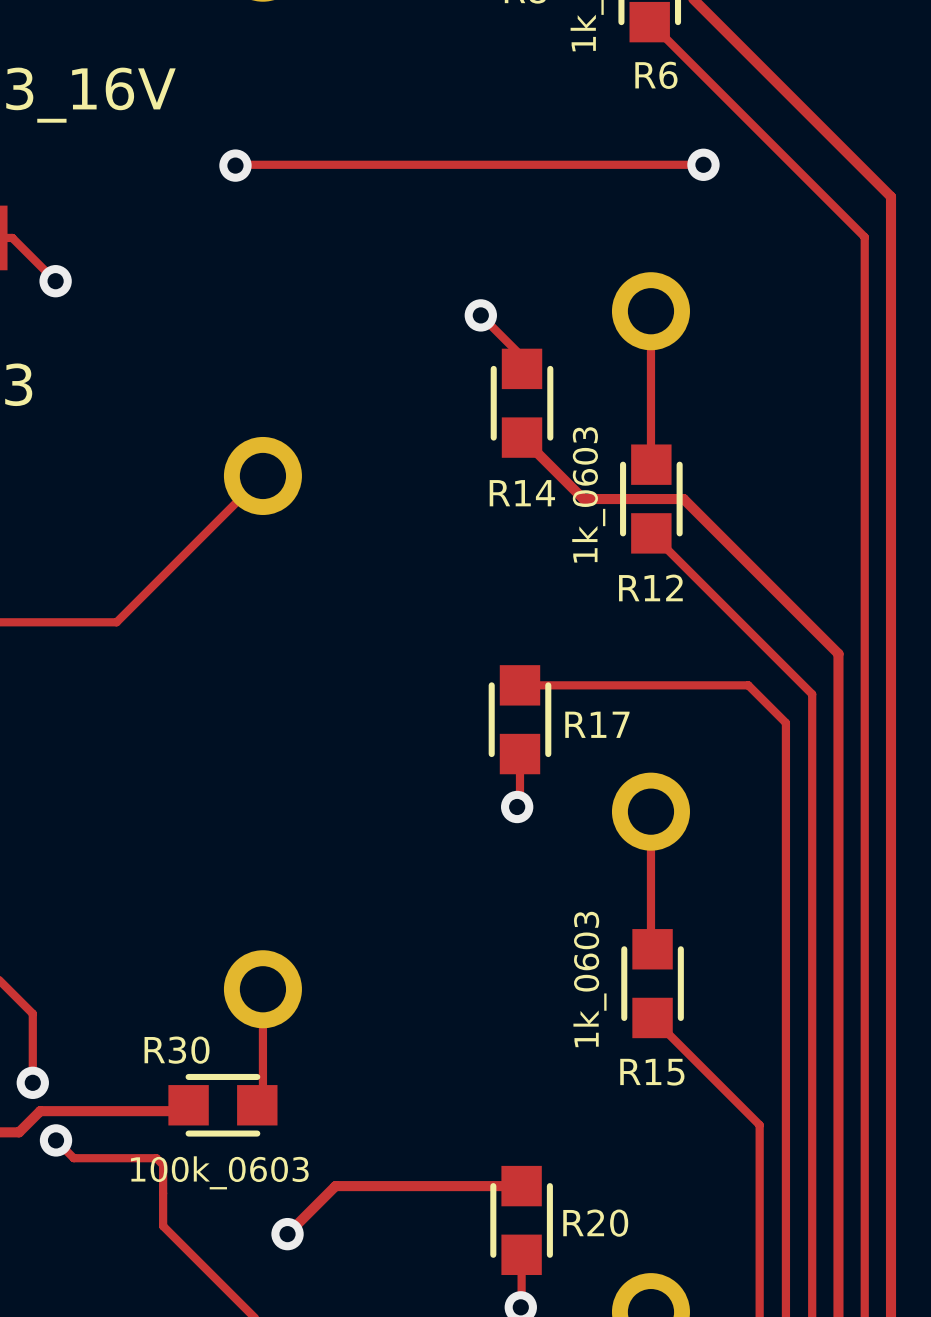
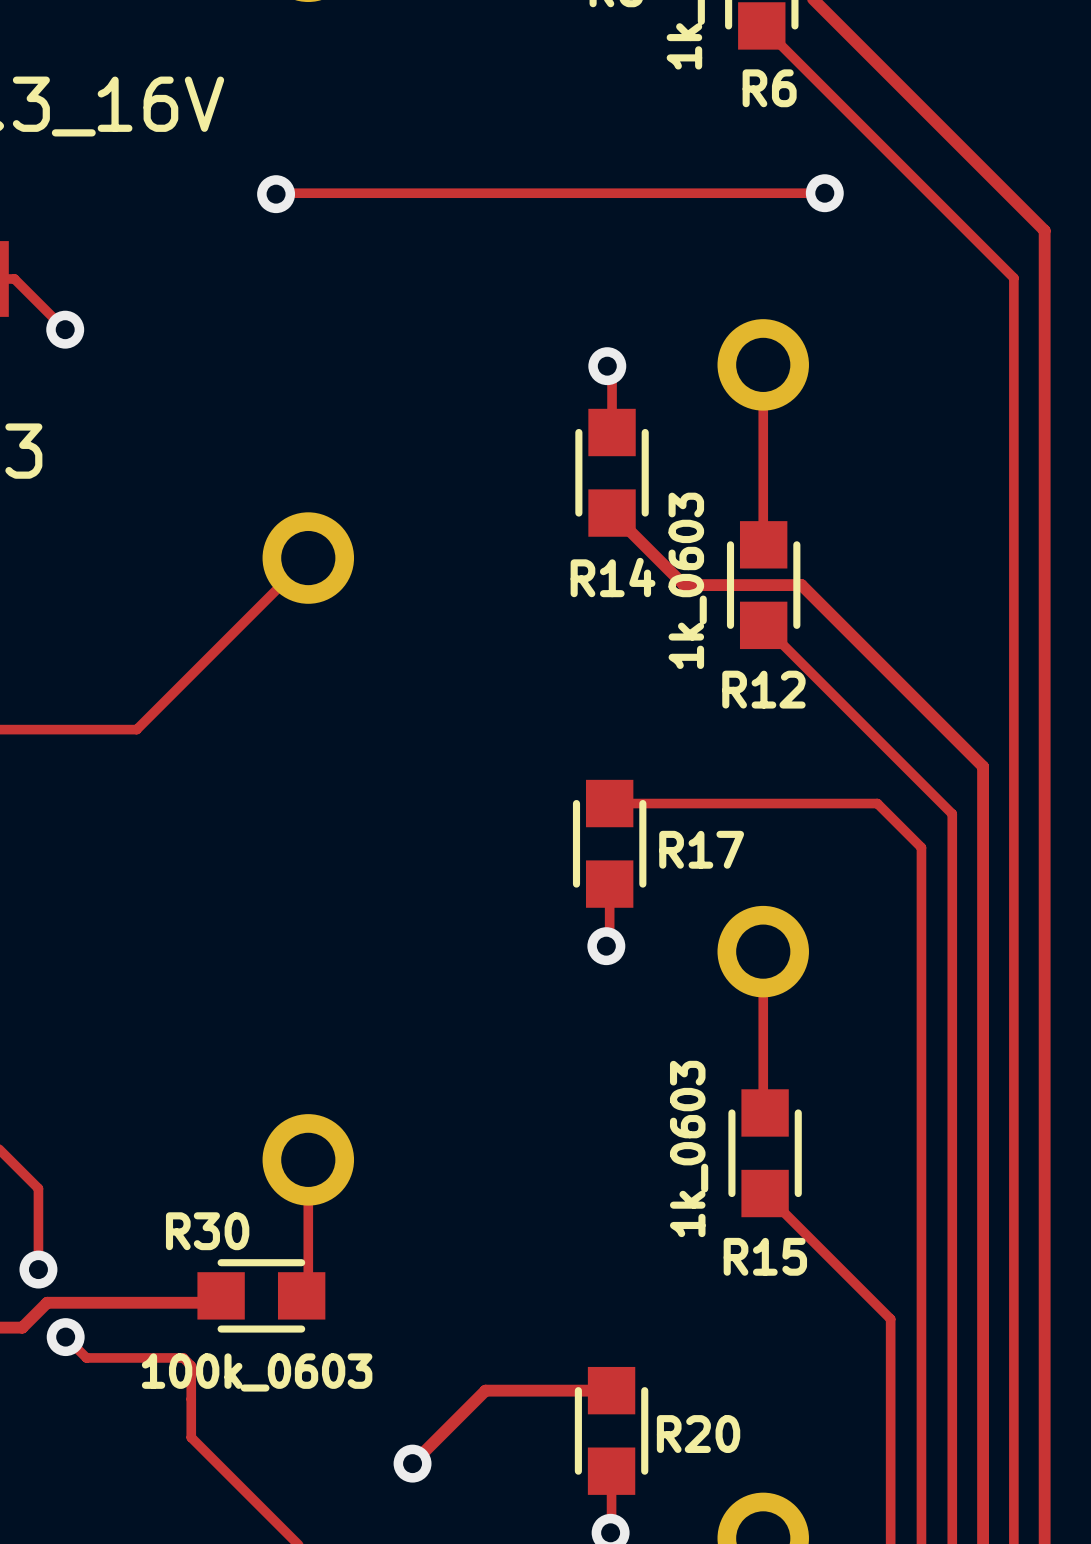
track: (480, 315) (522, 356) -> (607, 366) (612, 370) (612, 418)
via position: (480, 315) -> (607, 366)
track: (414, 1186) (335, 1186) (287, 1234) -> (485, 1390) (412, 1463)
via position: (287, 1234) -> (412, 1463)

